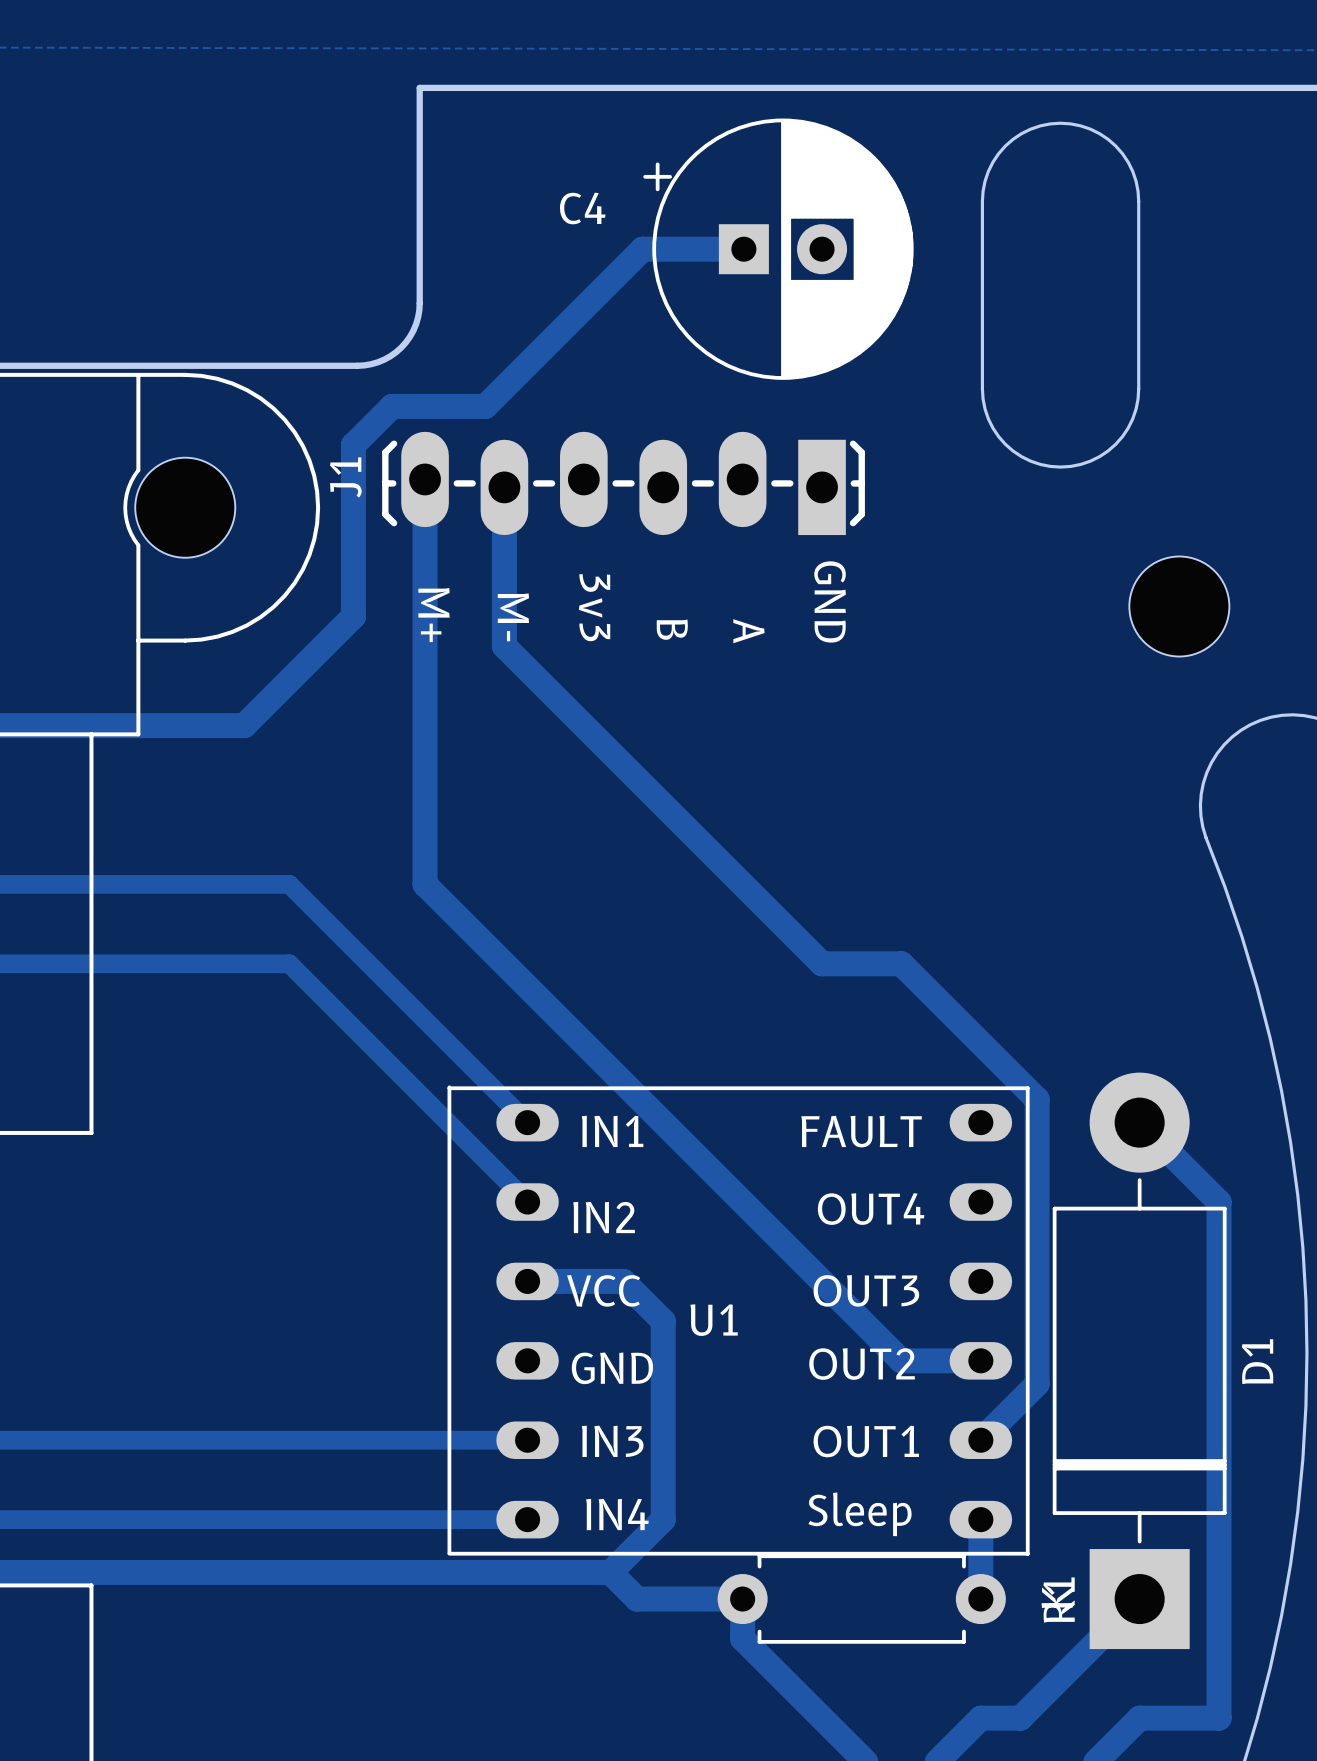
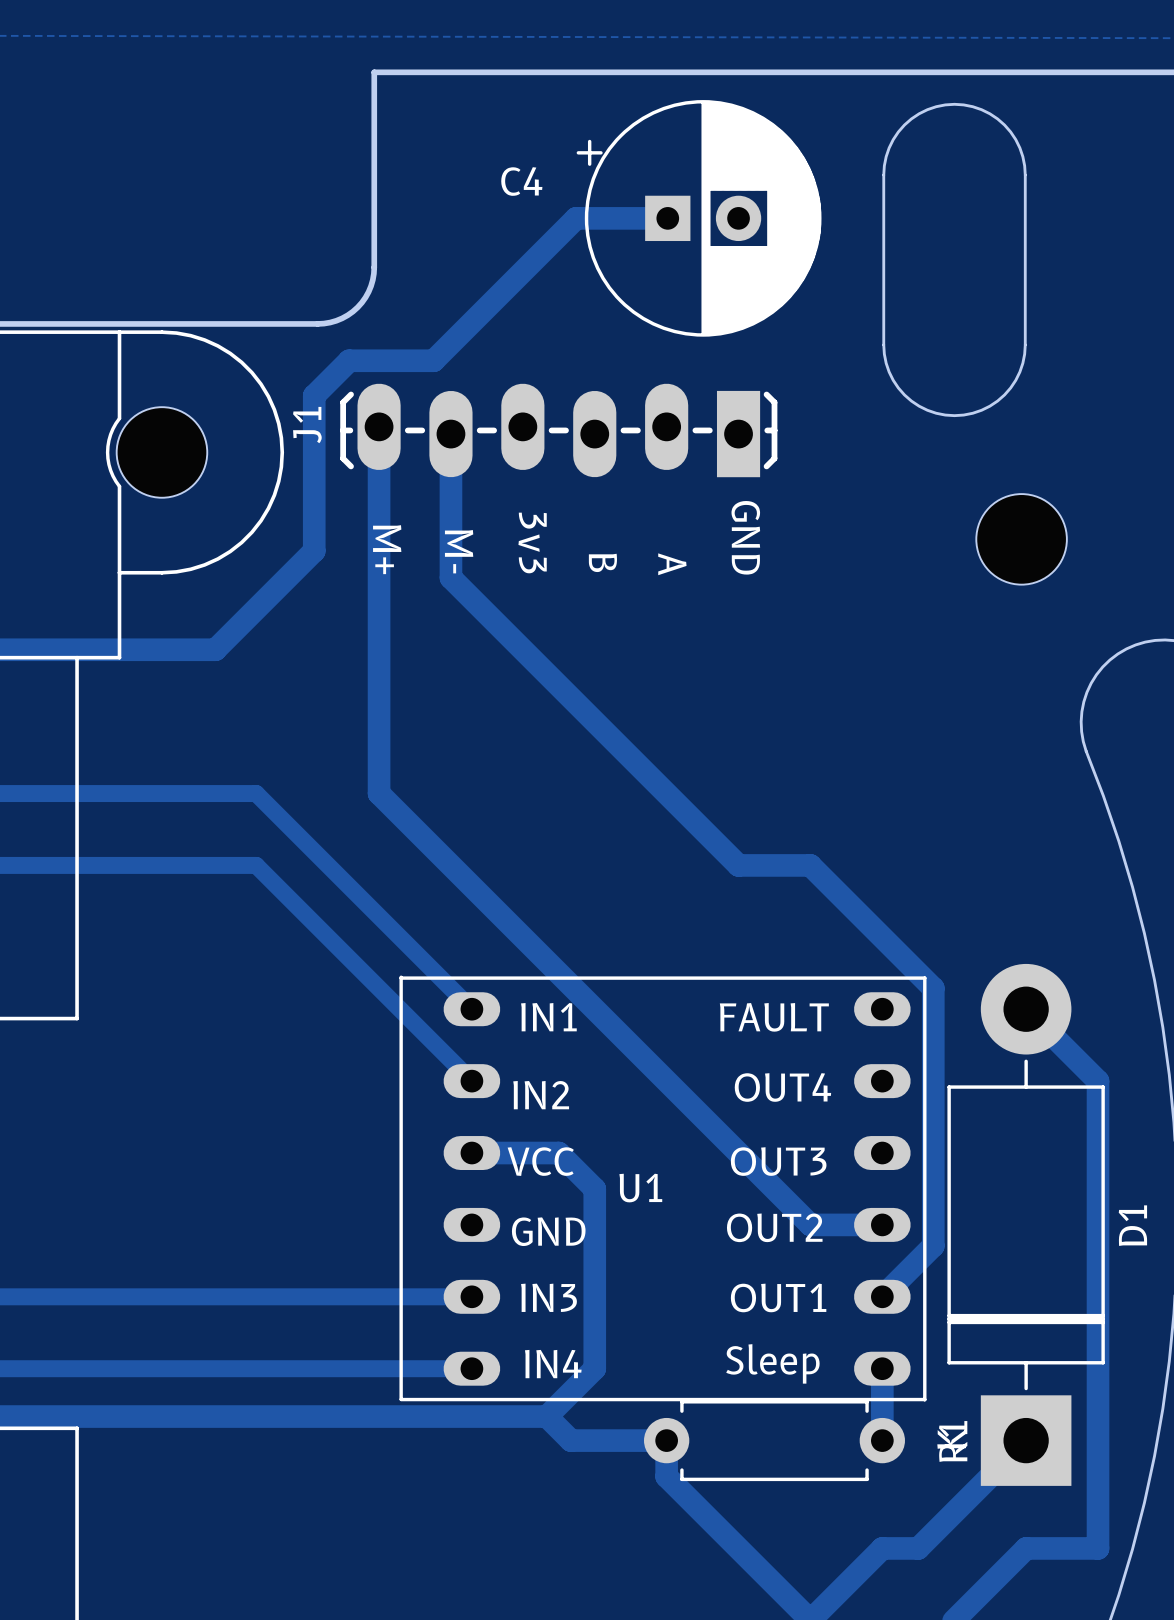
part position: (1179, 606) -> (1021, 539)

